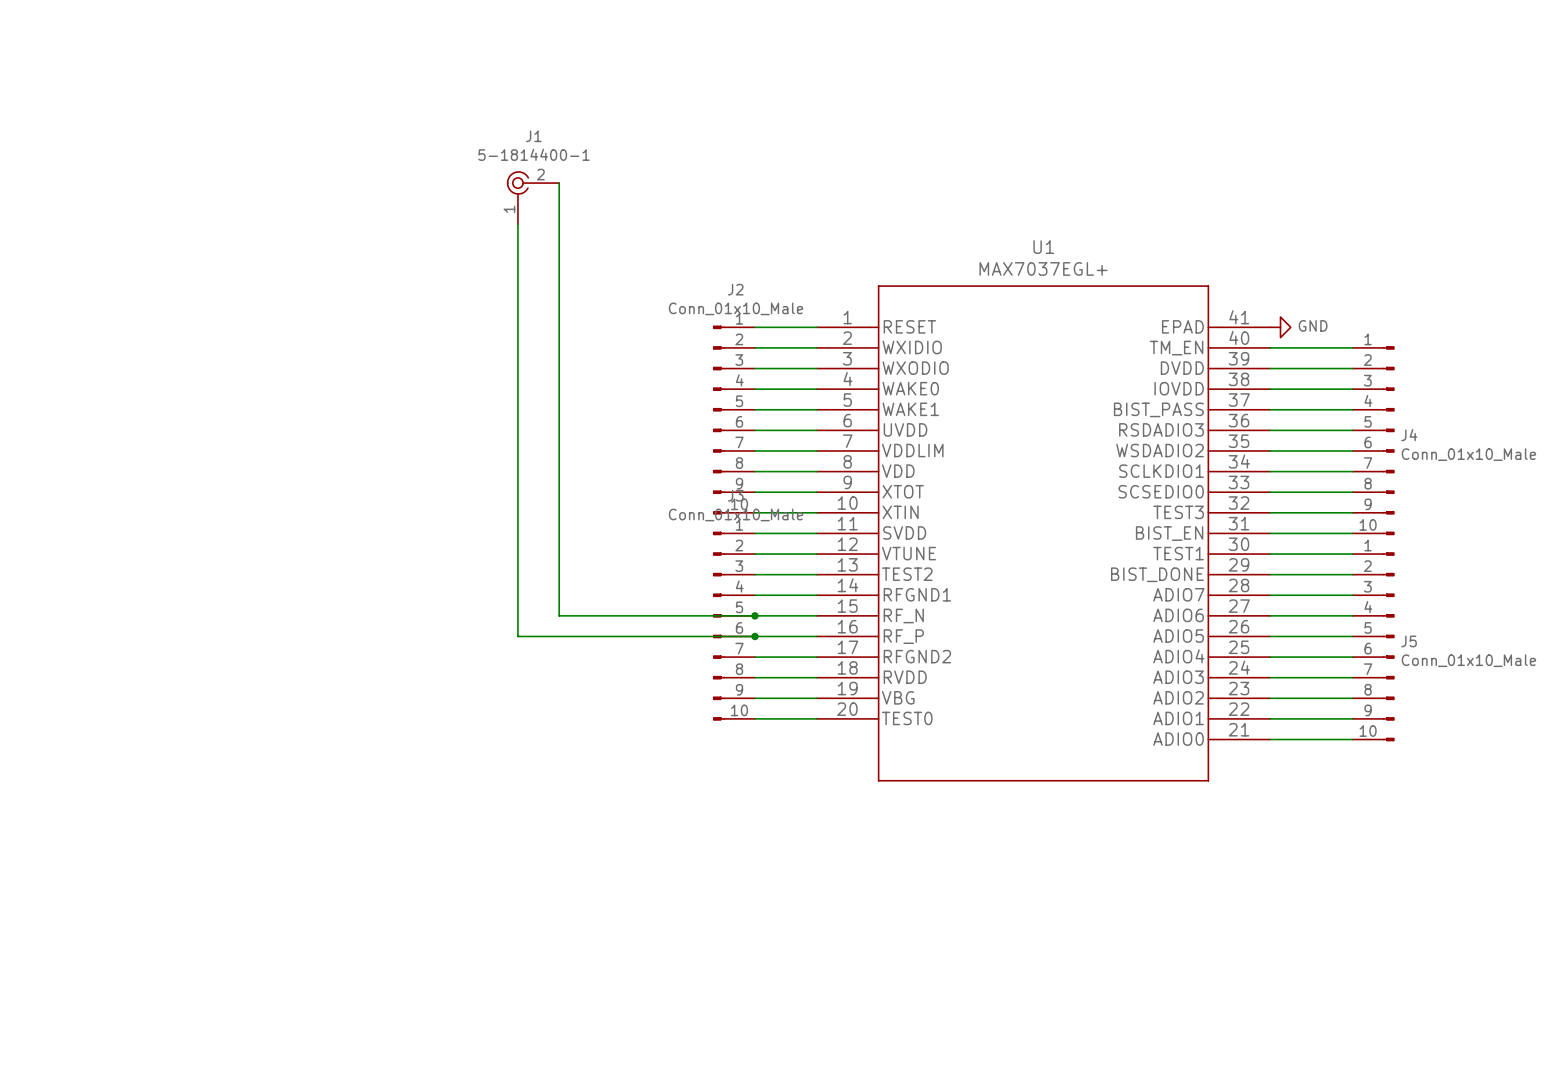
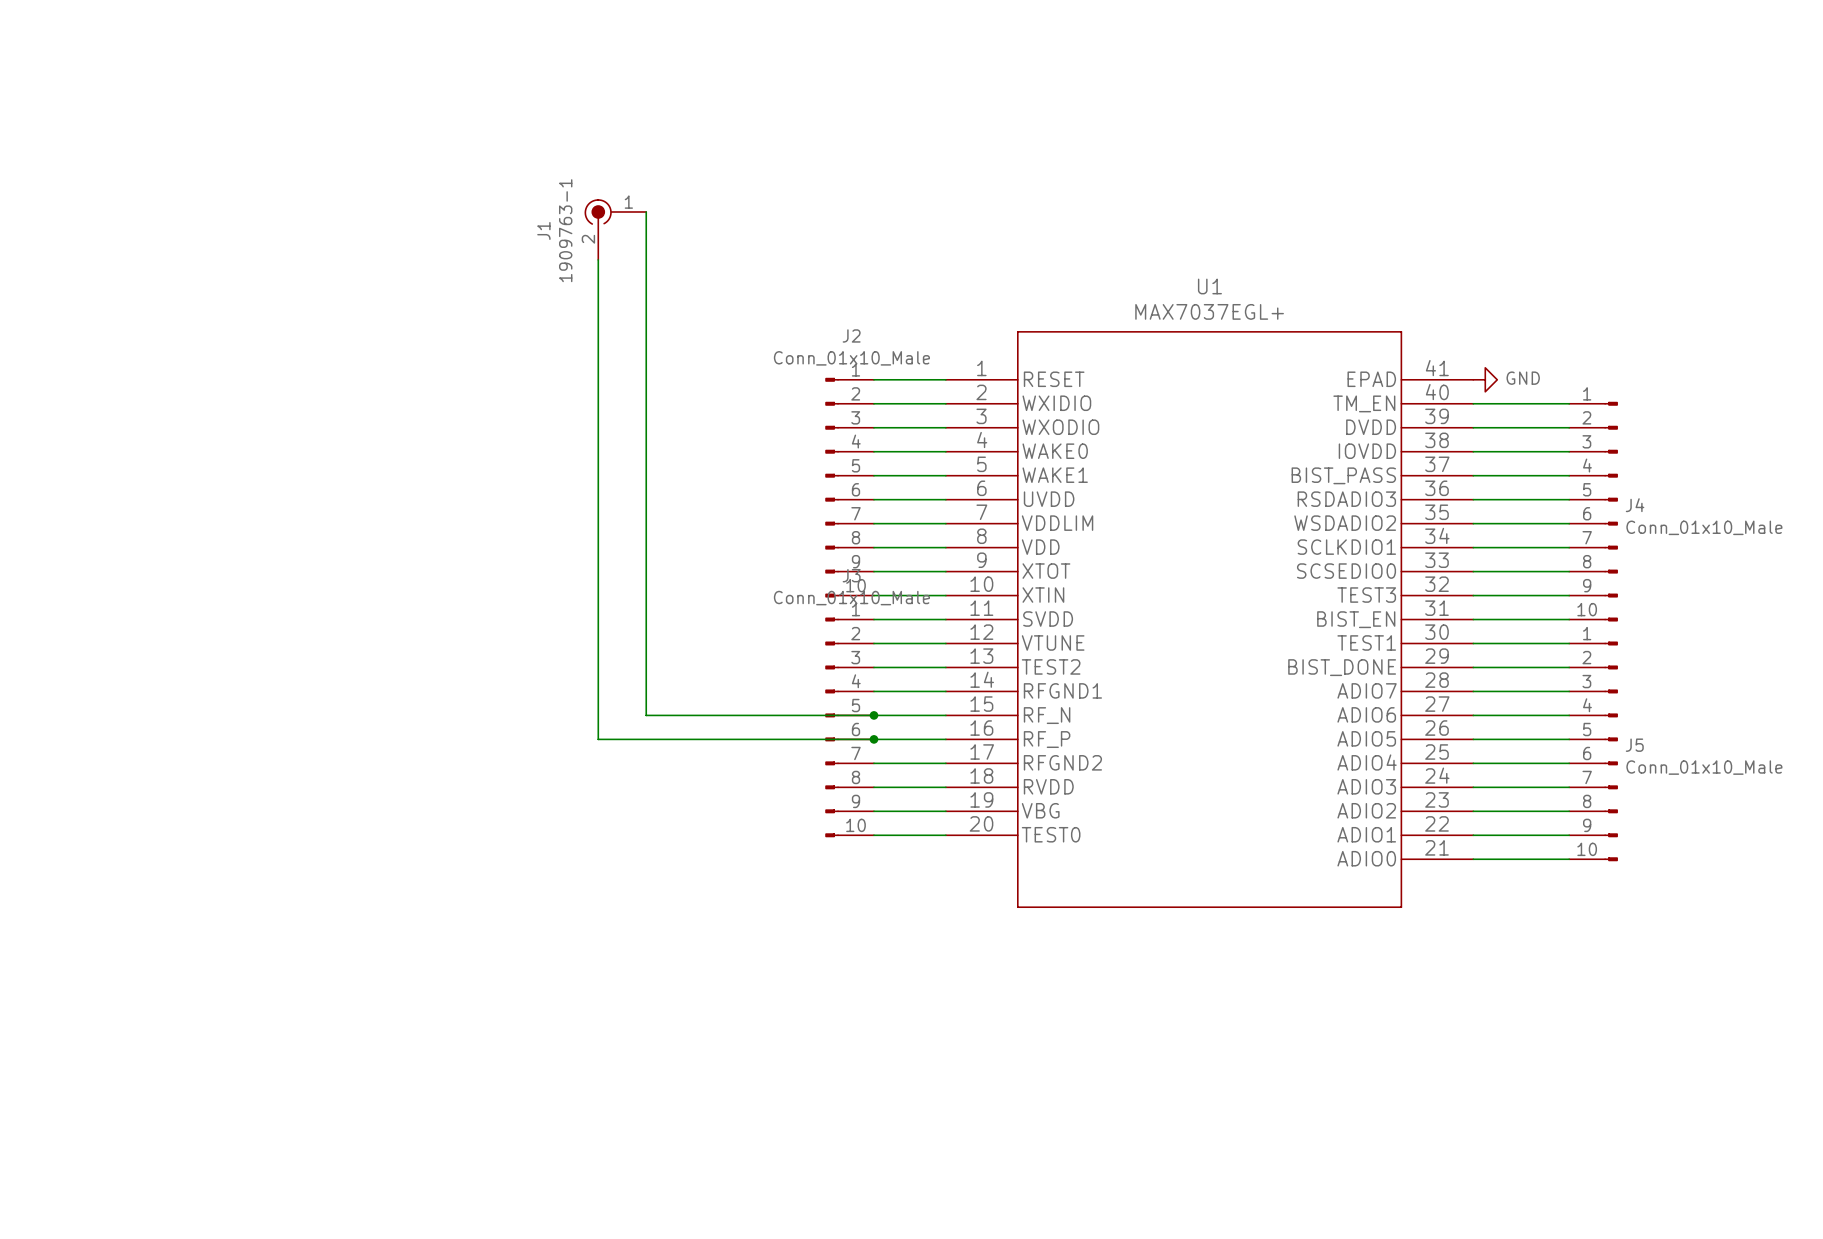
J1 name position: J1 (533, 136) -> J1 (543, 230)
J1 value: 5-1814400-1 (534, 154) -> 1909763-1 (565, 230)
J1 symbol: [507, 171, 560, 225] -> [585, 200, 647, 260]

